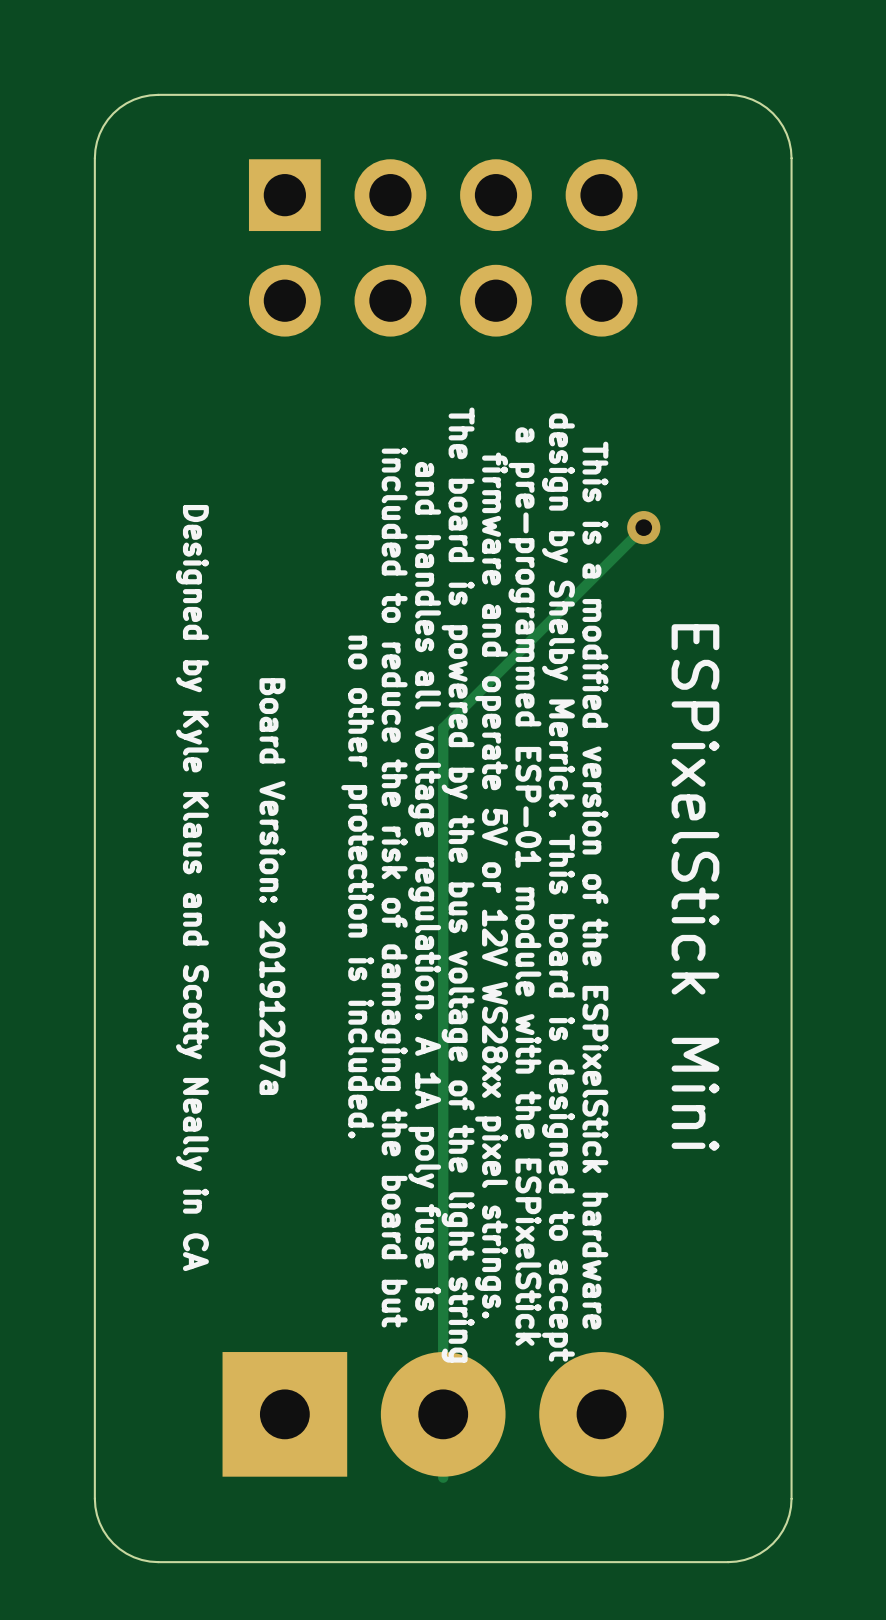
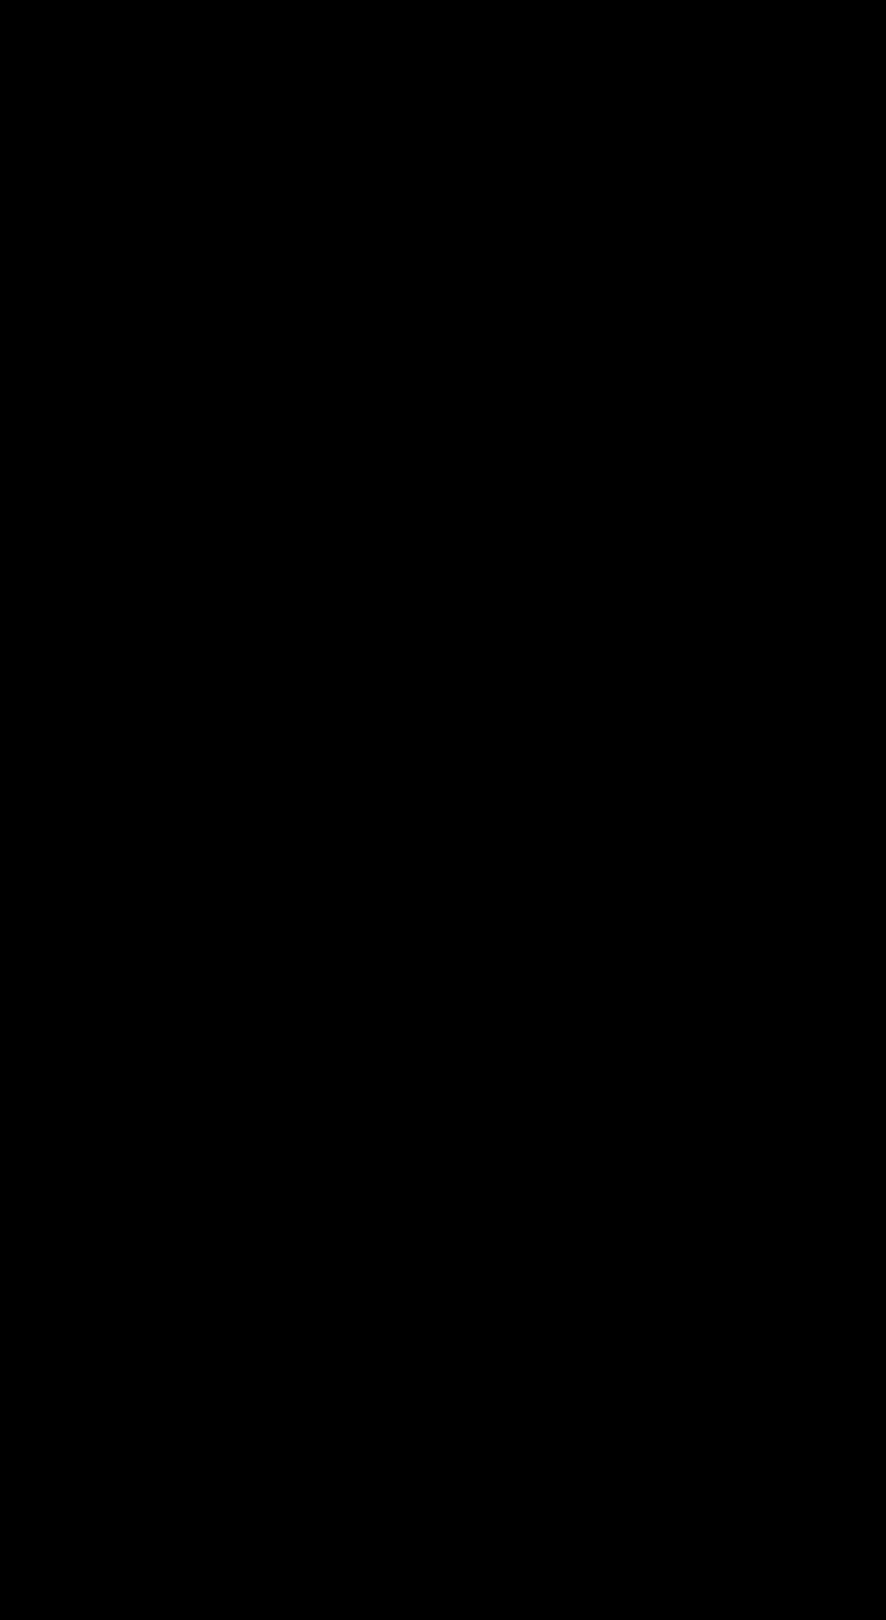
board edge: (728, 94) (158, 94) (141, 97) (126, 103) (113, 113) (99, 133) (94, 158) (94, 1498) (97, 1515) (103, 1530) (119, 1549) (133, 1557) (158, 1562) (728, 1562) (744, 1559) (766, 1549) (778, 1537) (786, 1523) (791, 1498) (791, 158) (786, 133) (773, 113) (752, 99) (728, 94) -> none
part: (443, 247) -> none
track: (643, 527) (443, 728) (443, 1477) -> none
via: (643, 527) -> none
text: The board is powered by the bus voltage of the light string (458, 885) -> none
text: firmware and operate 5V or 12V WS28xx pixel strings. (491, 885) -> none
text: This is a modified version of the ESPixelStick hardware (595, 885) -> none
text: Board Version: 20191207a (272, 886) -> none
text: and handles all voltage regulation. A 1A poly fuse is (424, 886) -> none
text: a pre-programmed ESP-01 module with the ESPixelStick (525, 886) -> none
text: no other protection is included. (357, 887) -> none
text: included to reduce the risk of damaging the board but (391, 887) -> none
text: design by Shelby Merrick. This board is designed to accept (558, 887) -> none
text: ESPixelStick Mini (695, 887) -> none
text: Designed by Kyle Klaus and Scotty Neally in CA (192, 888) -> none
part: (443, 1414) -> none

